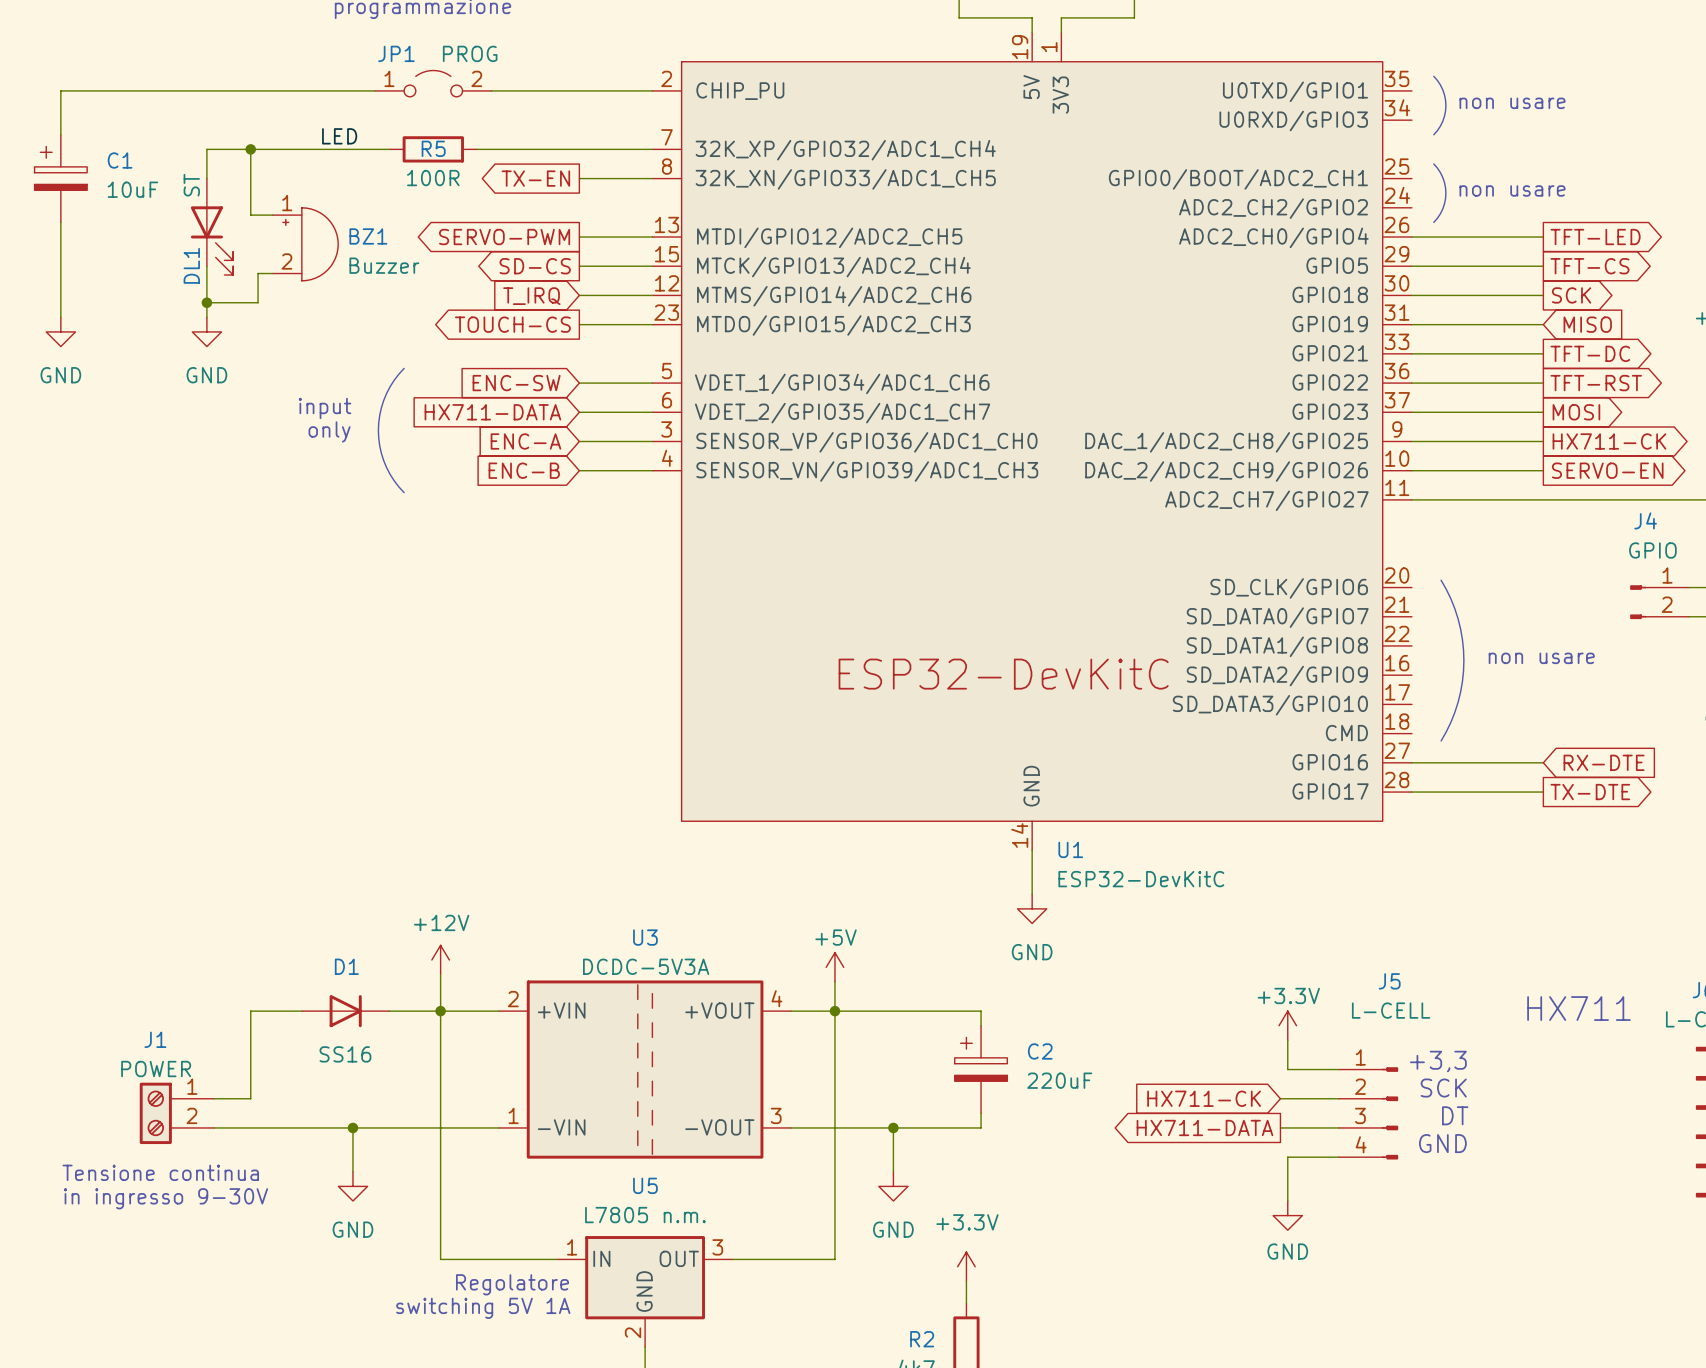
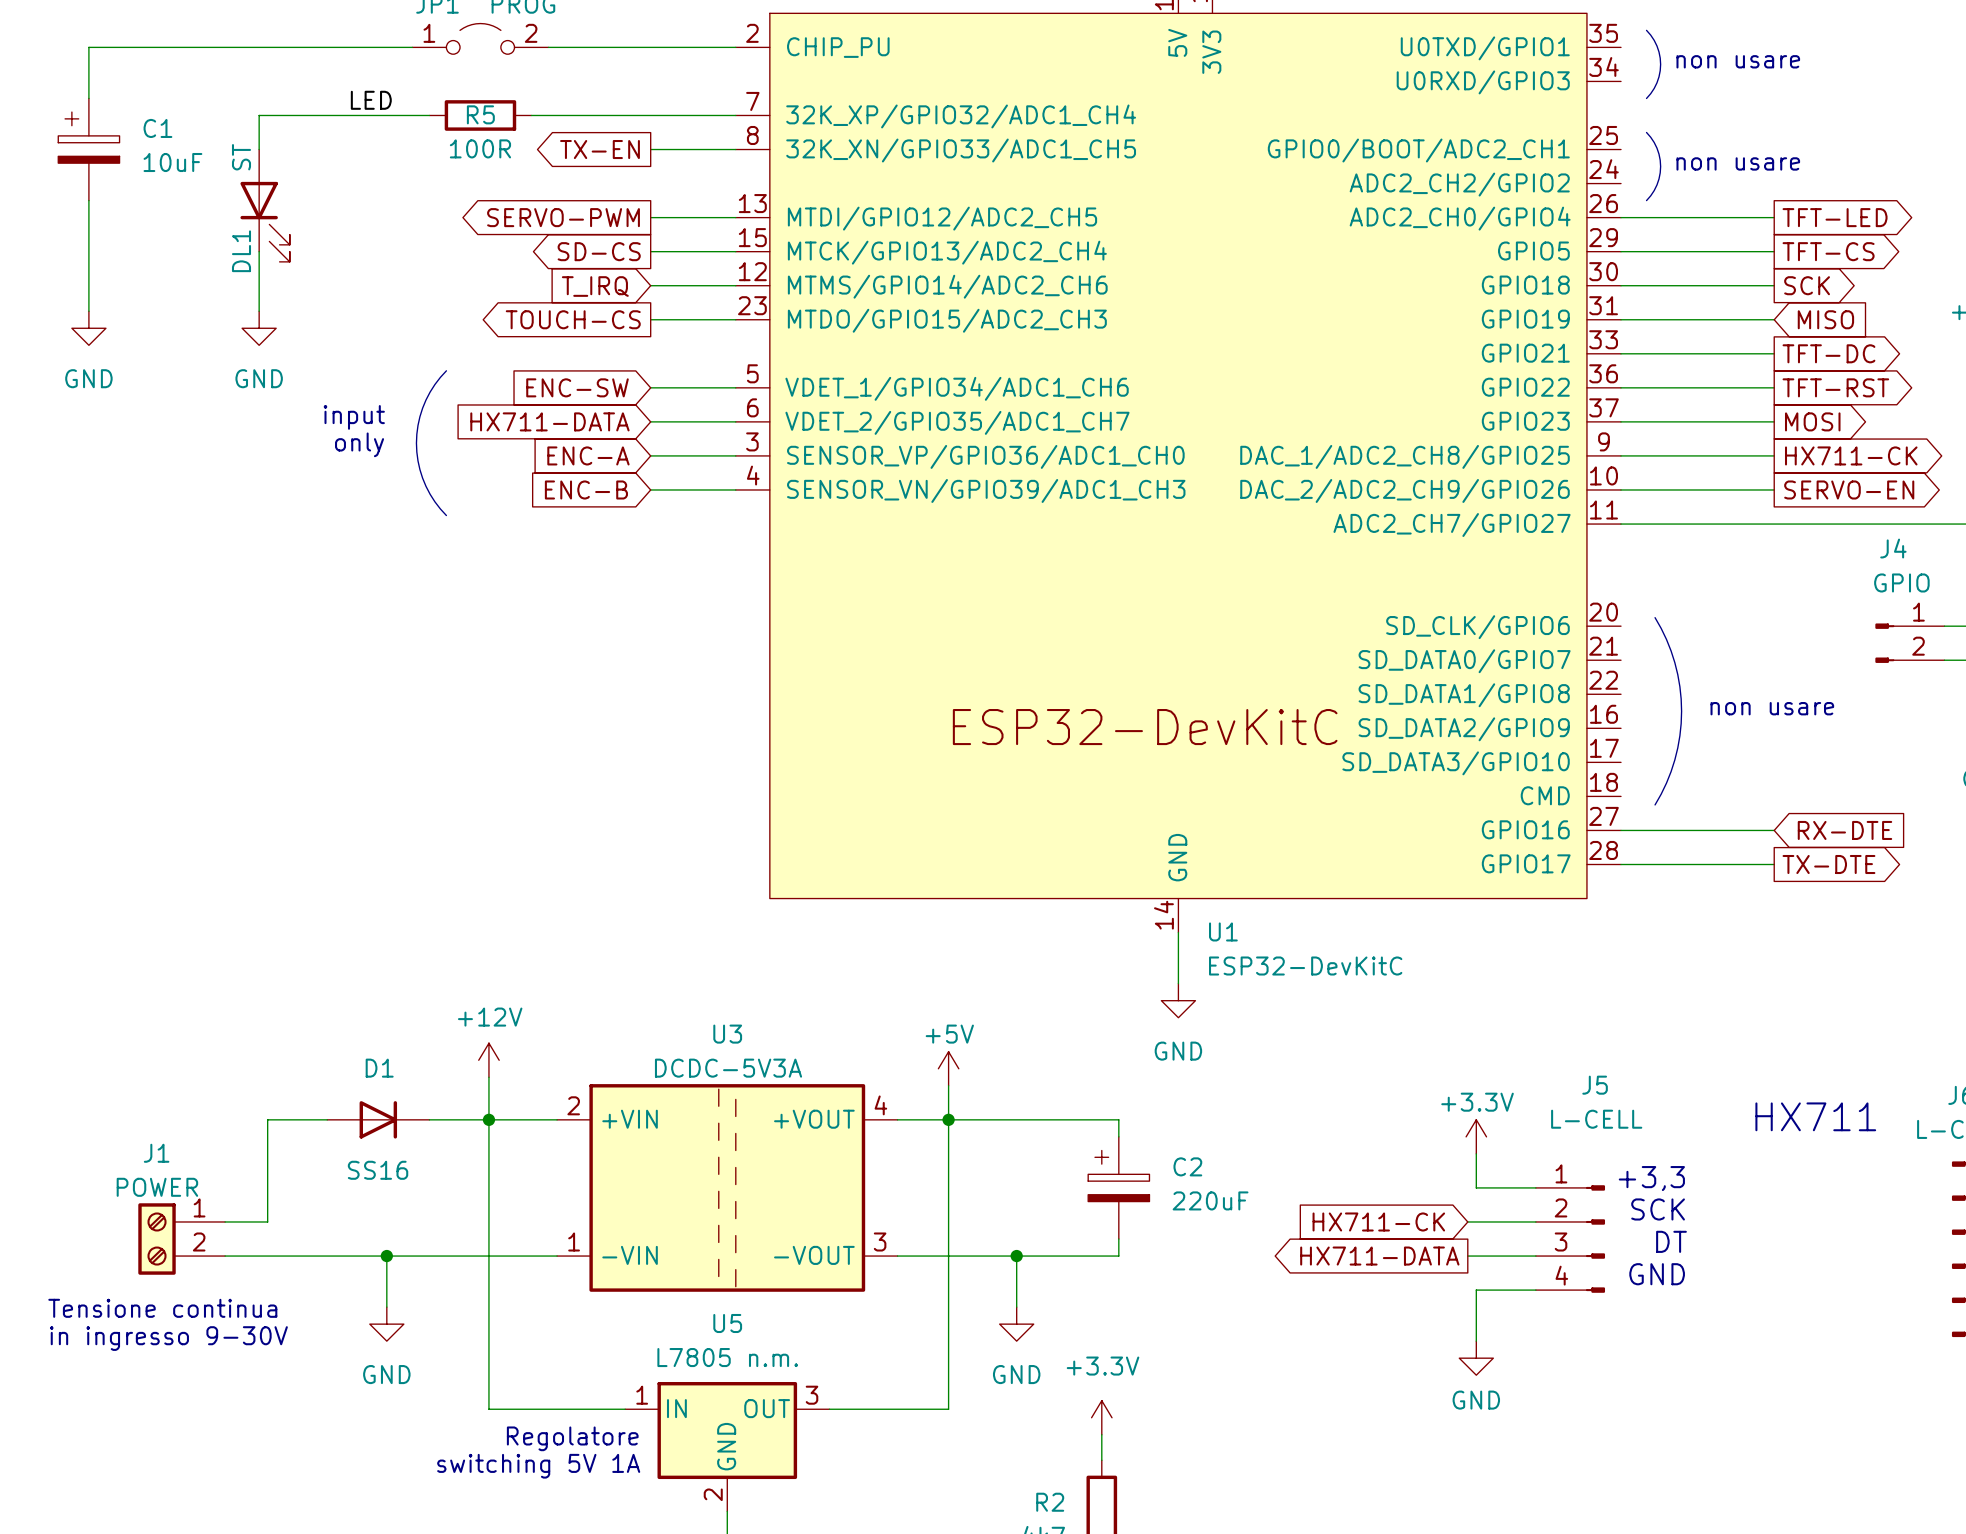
wire: (97, 90) (60, 90) (60, 134) -> (88, 47) (88, 98)
wire: (243, 149) (206, 149) (206, 178) -> (259, 115) (259, 149)
wire: (250, 149) (250, 215) (272, 215) -> none
junction: (250, 149) -> none
C1 position: (60, 178) -> (88, 149)
wire: (60, 222) (60, 317) -> (88, 200) (88, 311)
DL1 position: (212, 226) -> (265, 205)
BZ1: Buzzer (305, 244) -> none
wire: (206, 266) (206, 317) -> (259, 251) (259, 311)
wire: (272, 273) (258, 273) (258, 302) (206, 302) -> none
junction: (206, 302) -> none
power symbol position: GND (60, 331) -> GND (88, 328)
power symbol position: GND (206, 331) -> GND (259, 328)

